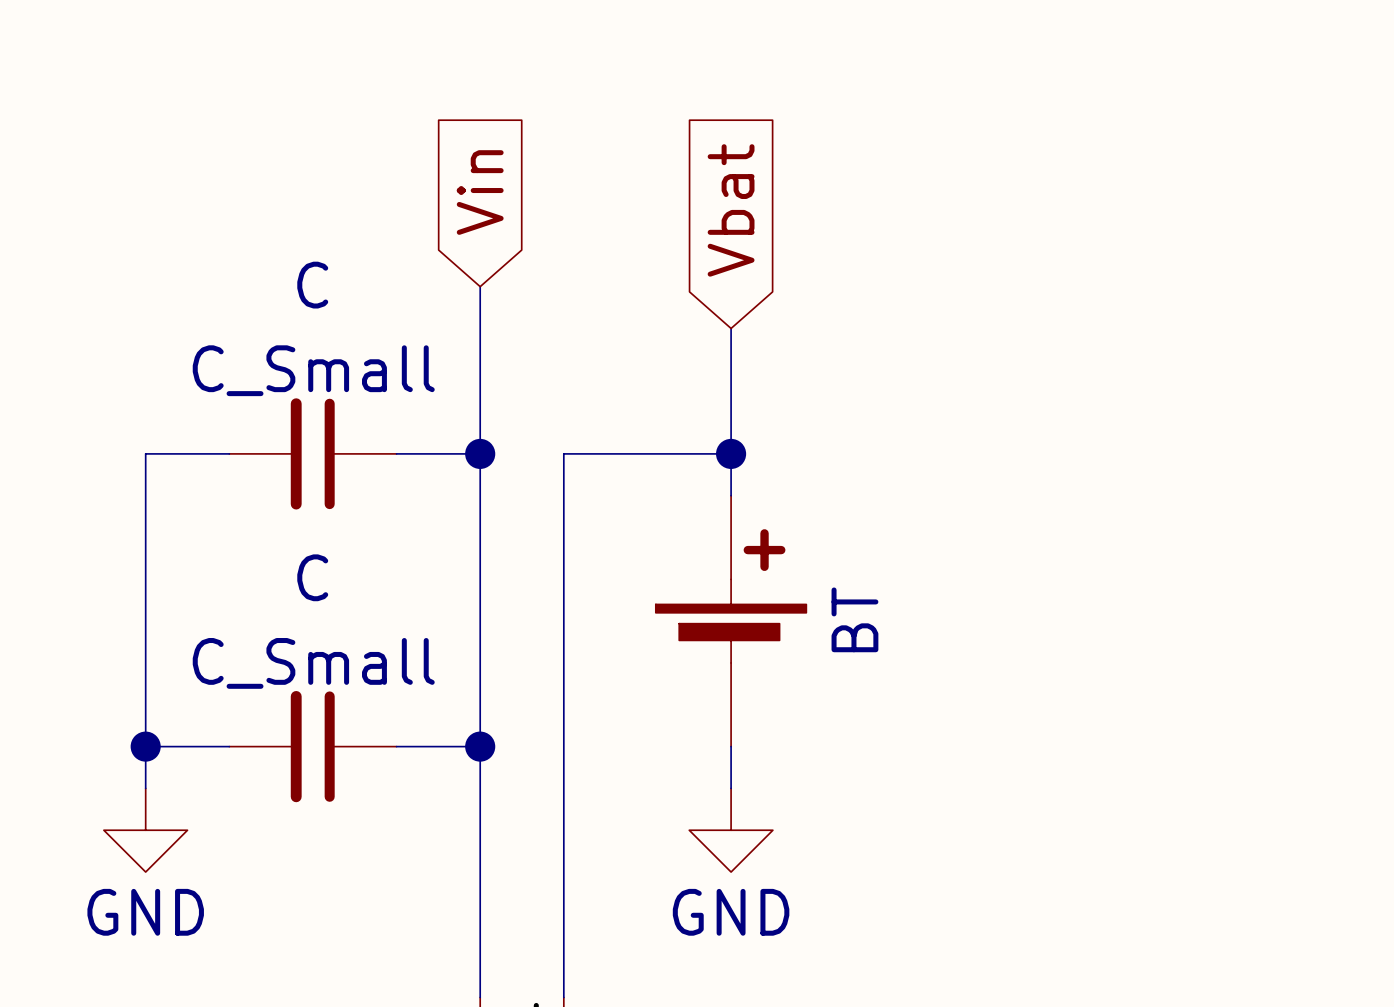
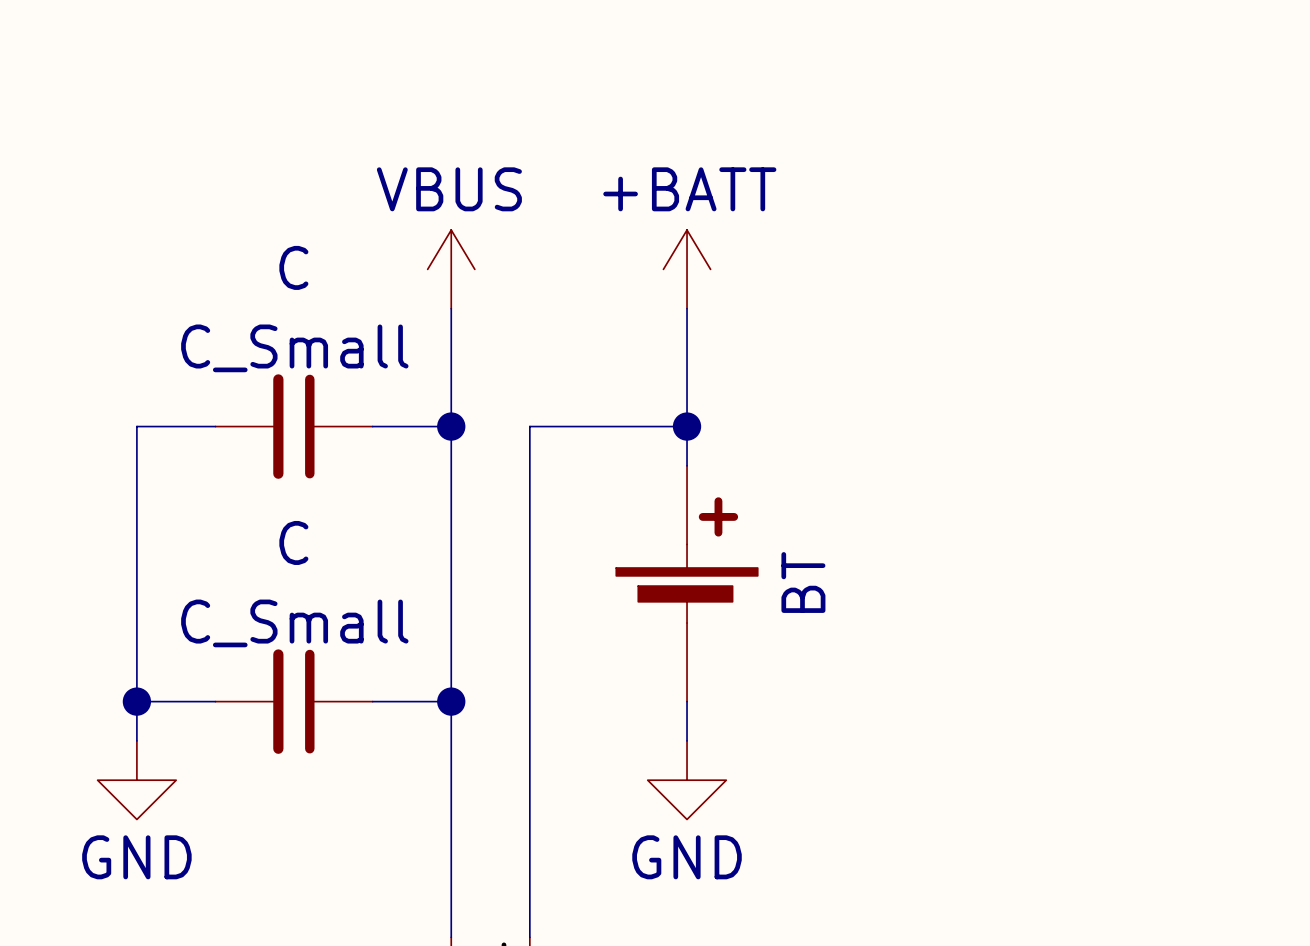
global label: Vin (480, 192) -> none
global label: Vbat (731, 210) -> none
power symbol: none -> VBUS (451, 269)
power symbol: none -> +BATT (687, 269)

